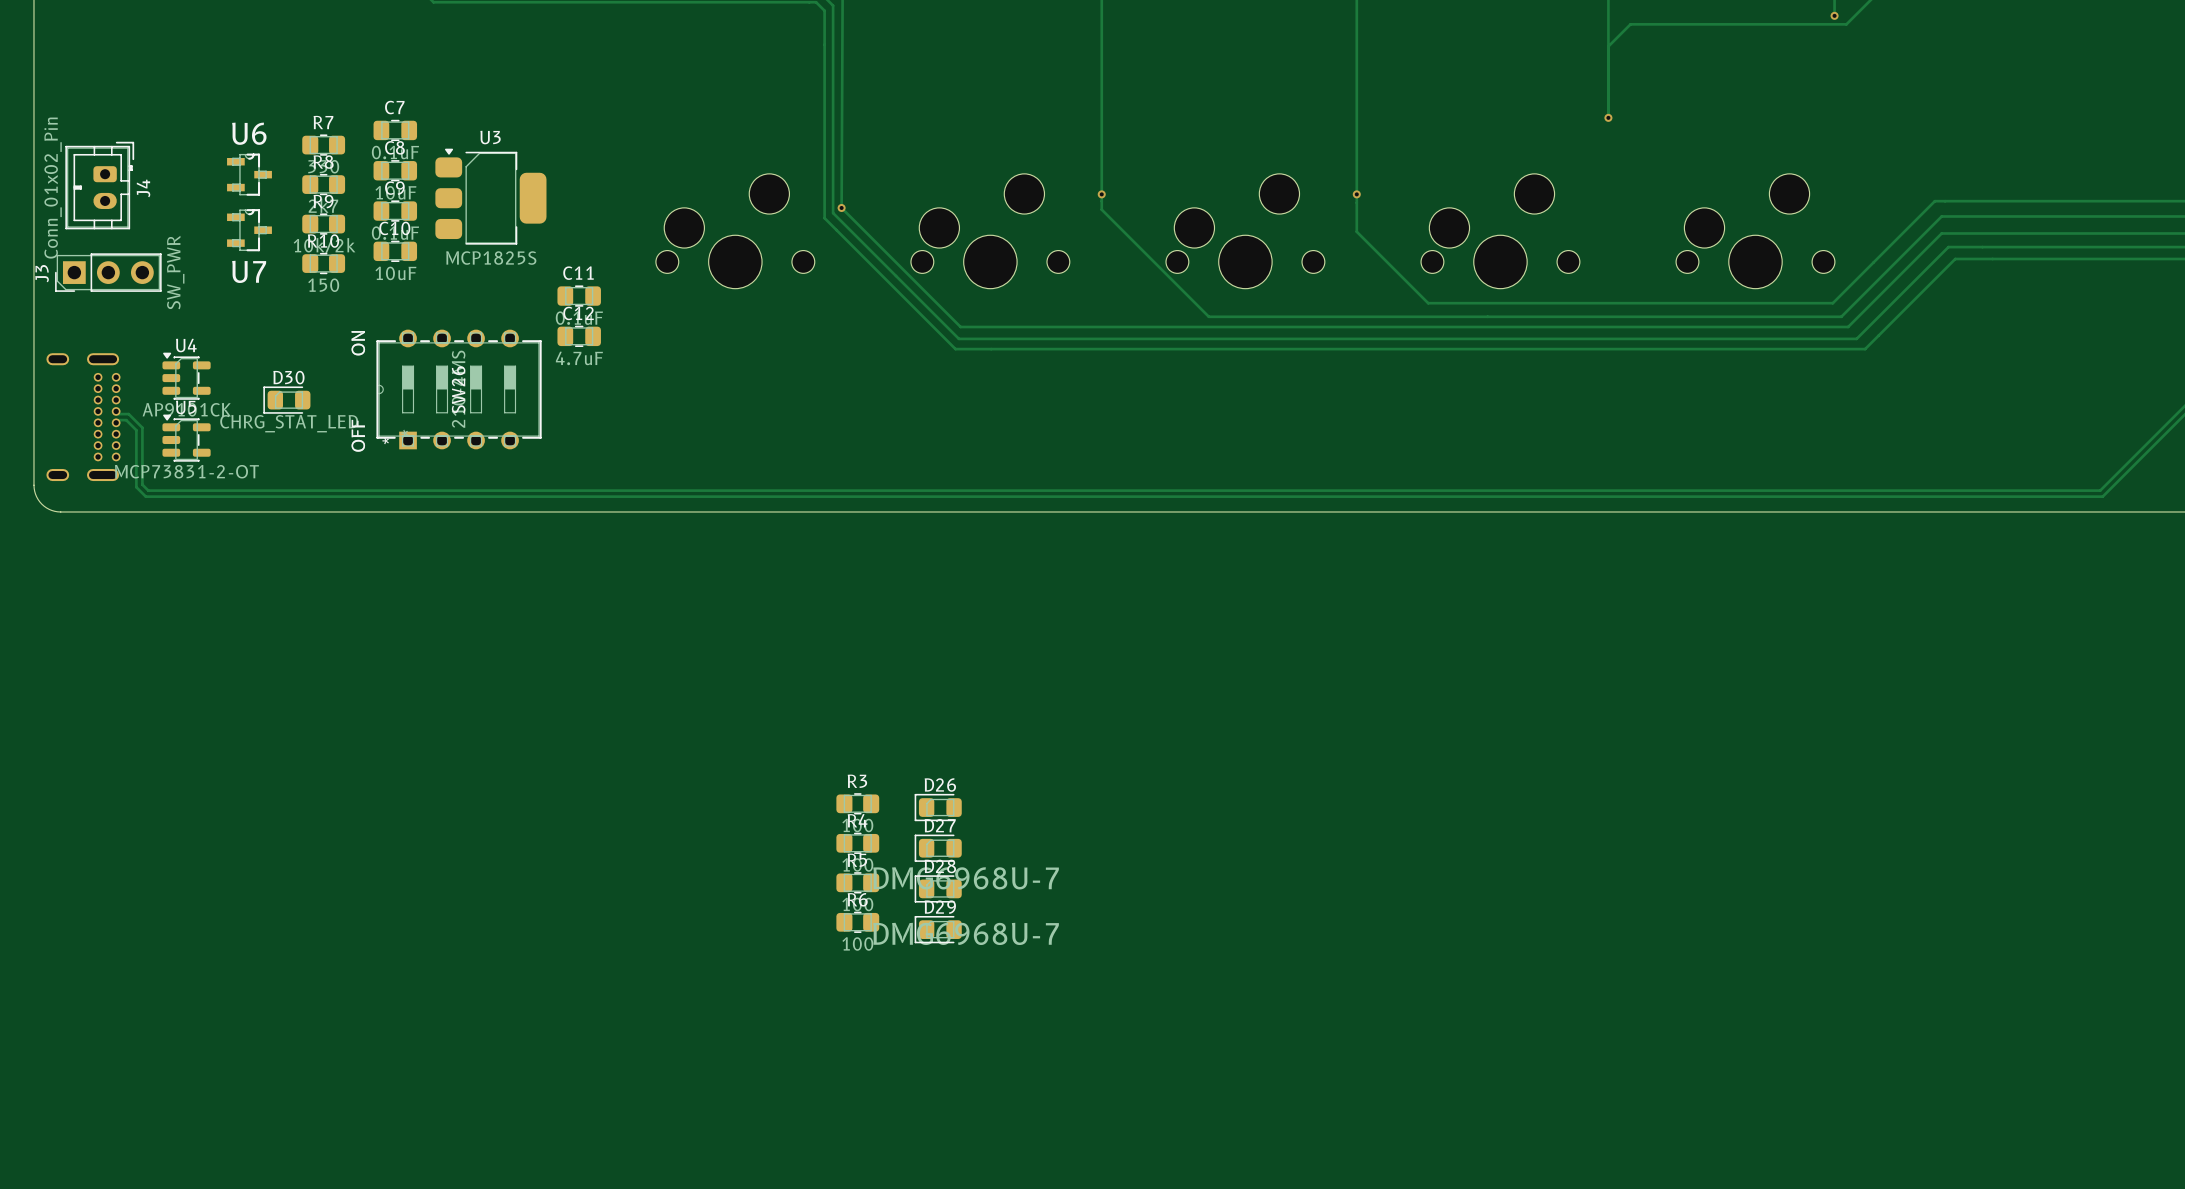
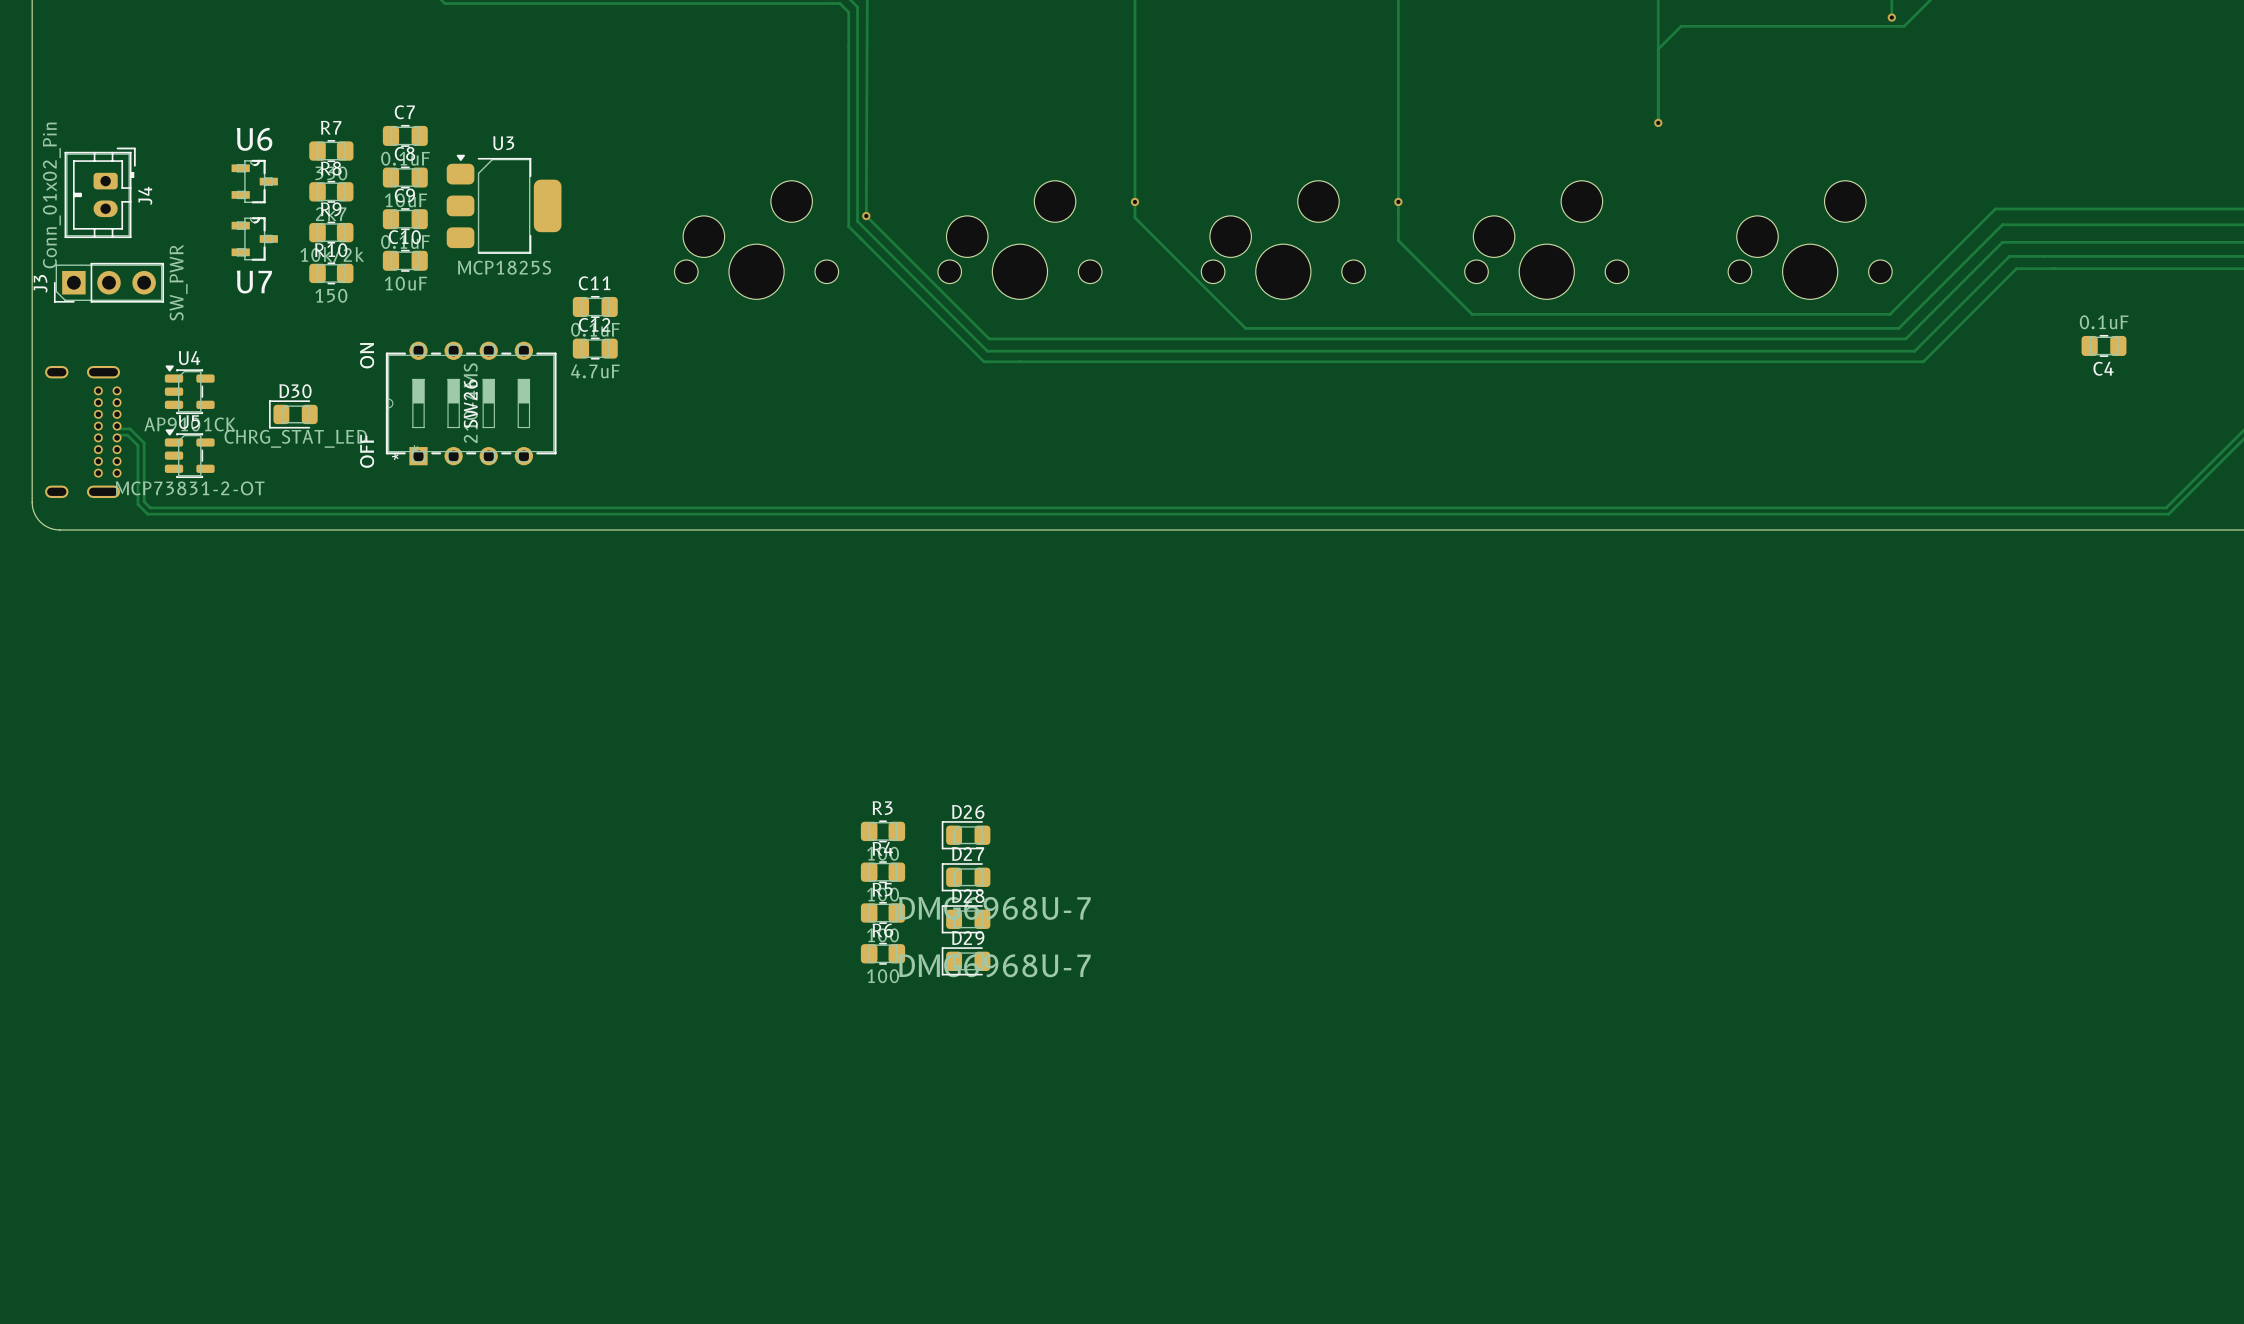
C4: none -> 0.1uF (2104, 345)

